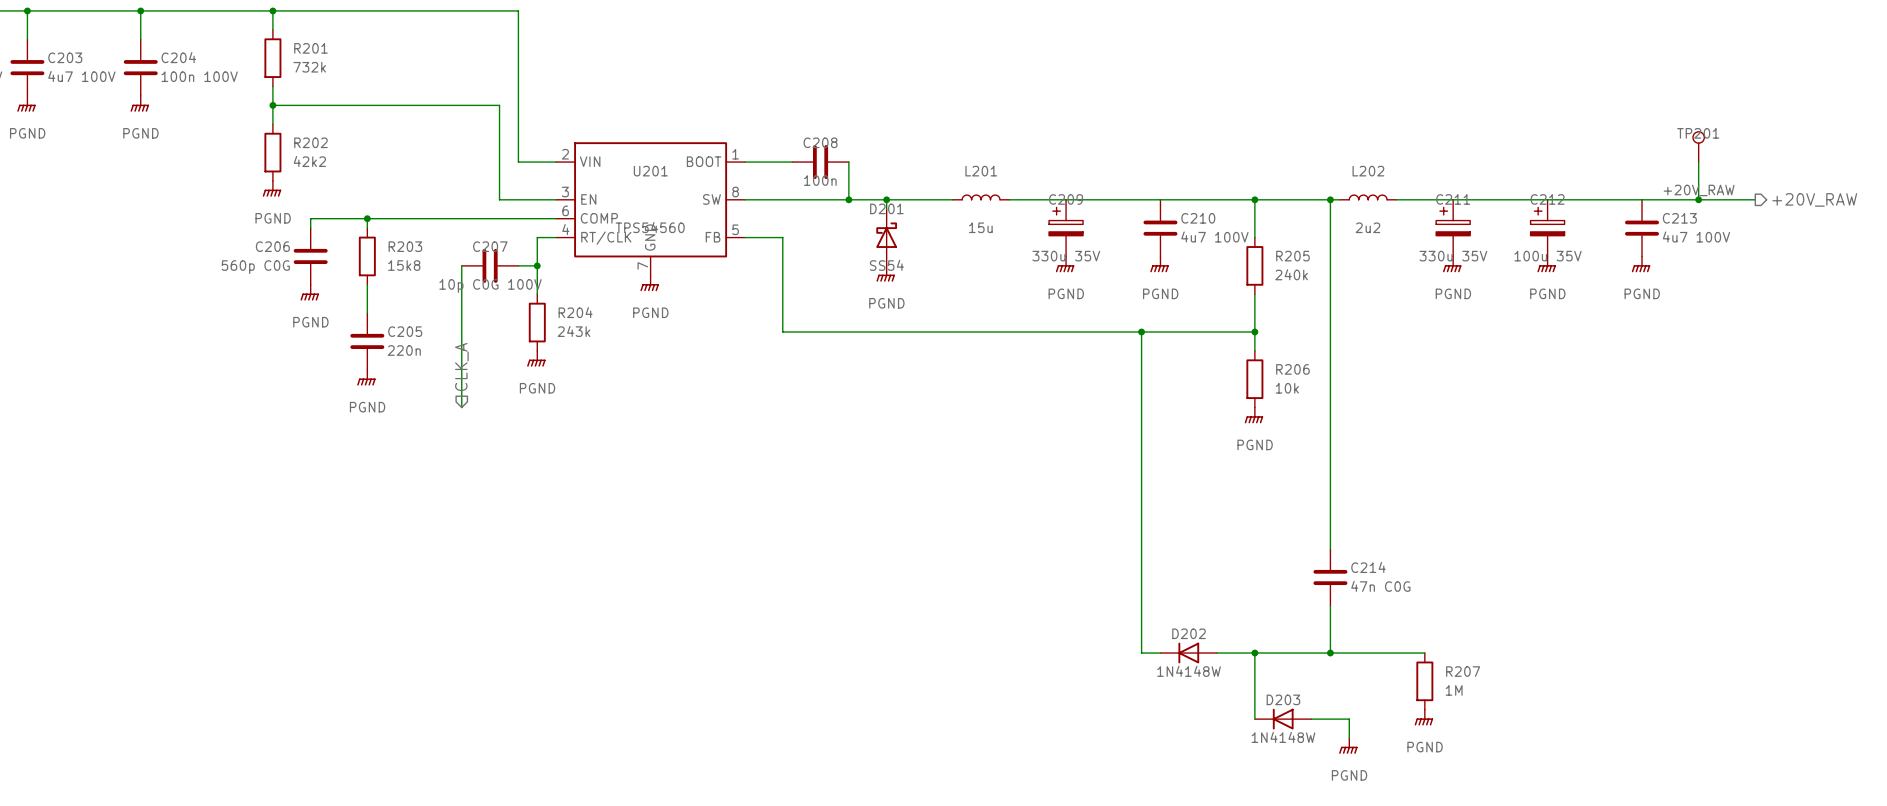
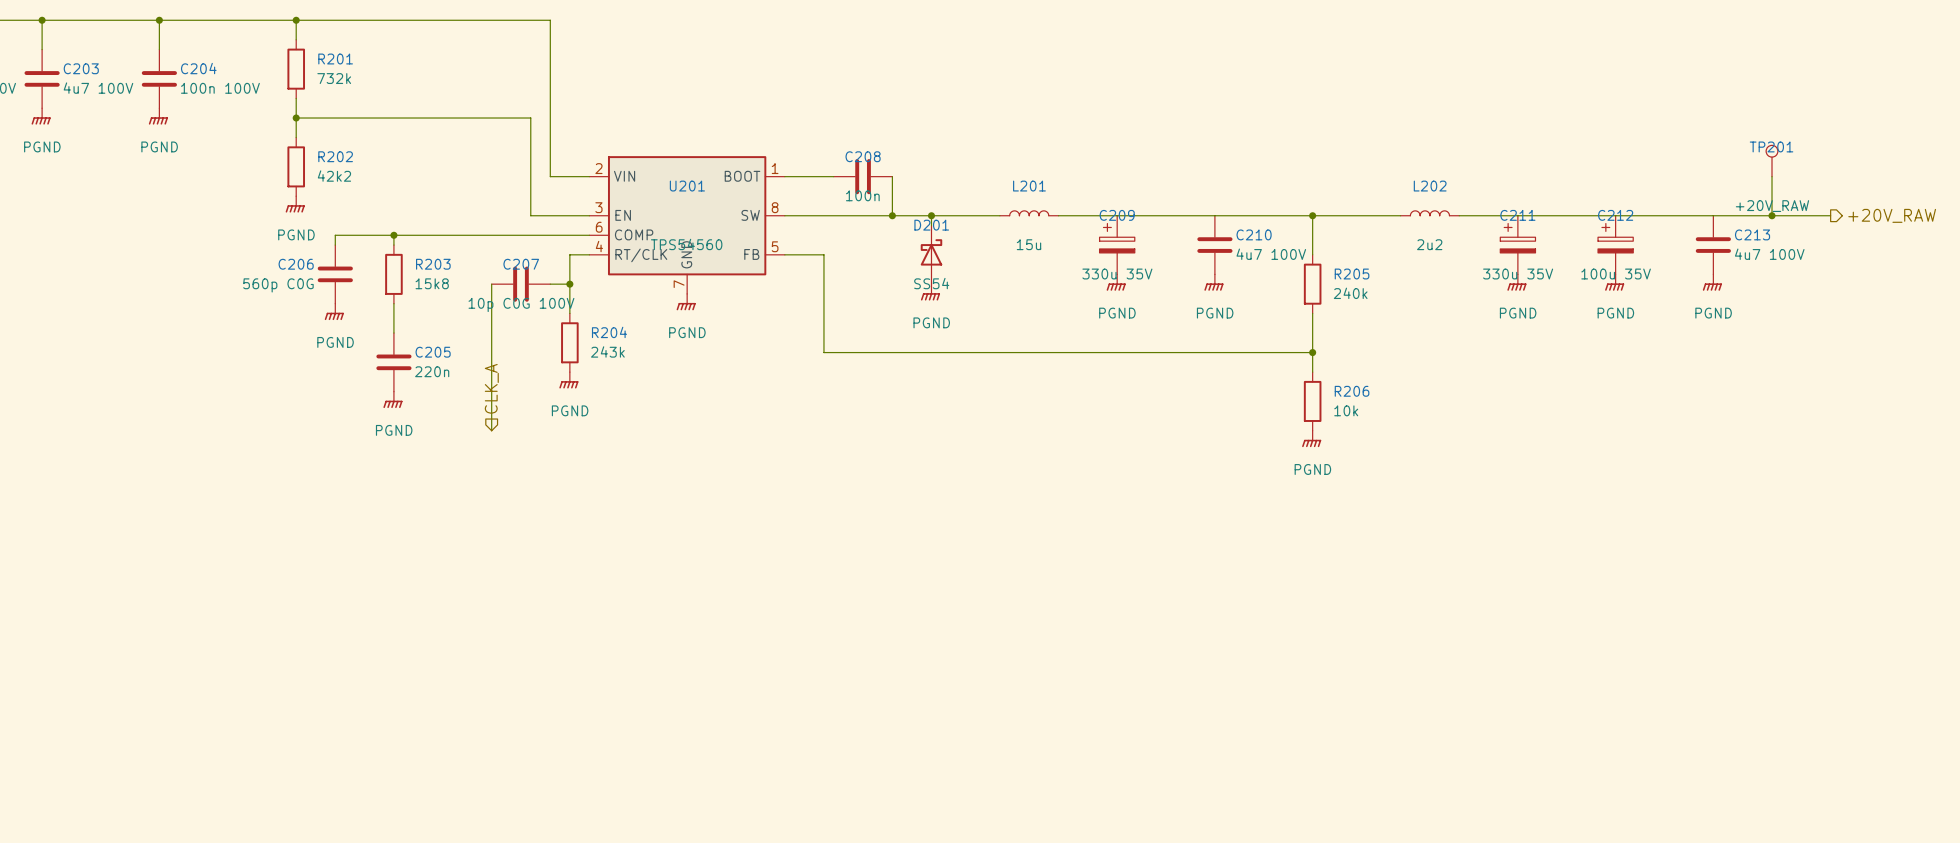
wire: (1330, 199) (1330, 549) -> none
junction: (1330, 199) -> none
wire: (1141, 331) (1141, 653) (1160, 653) -> none
junction: (1141, 331) -> none
C214: 47n C0G (1330, 577) -> none
wire: (1330, 605) (1330, 653) -> none
D202: 1N4148W (1188, 653) -> none
wire: (1217, 653) (1424, 653) -> none
wire: (1254, 653) (1254, 719) -> none
junction: (1254, 653) -> none
junction: (1330, 653) -> none
R207: 1M (1424, 681) -> none
power symbol: PGND (1423, 717) -> none
D203: 1N4148W (1283, 719) -> none
wire: (1311, 719) (1349, 719) (1349, 738) -> none
power symbol: PGND (1348, 745) -> none

